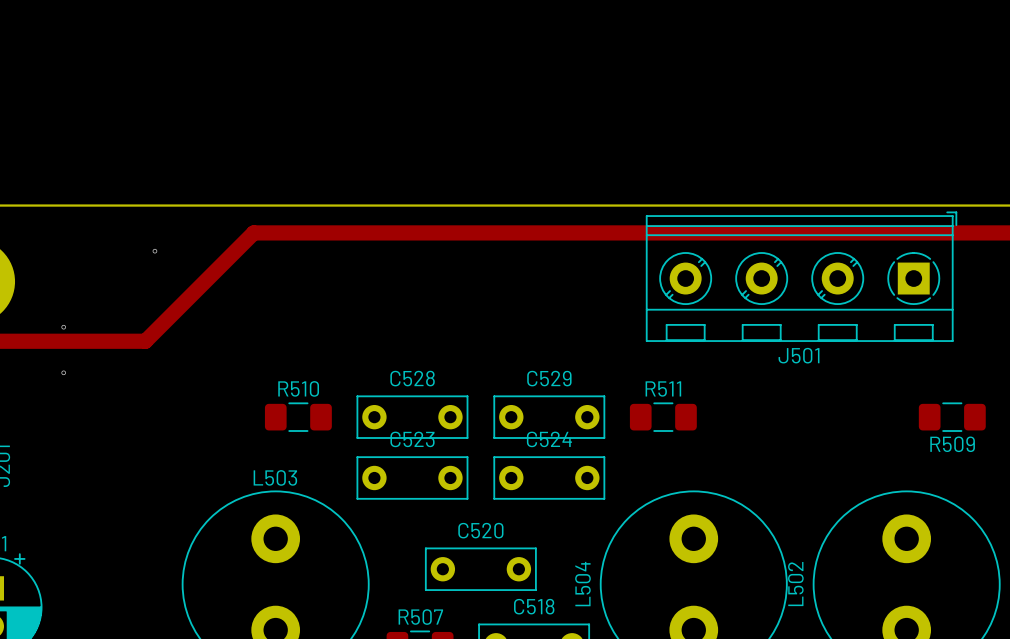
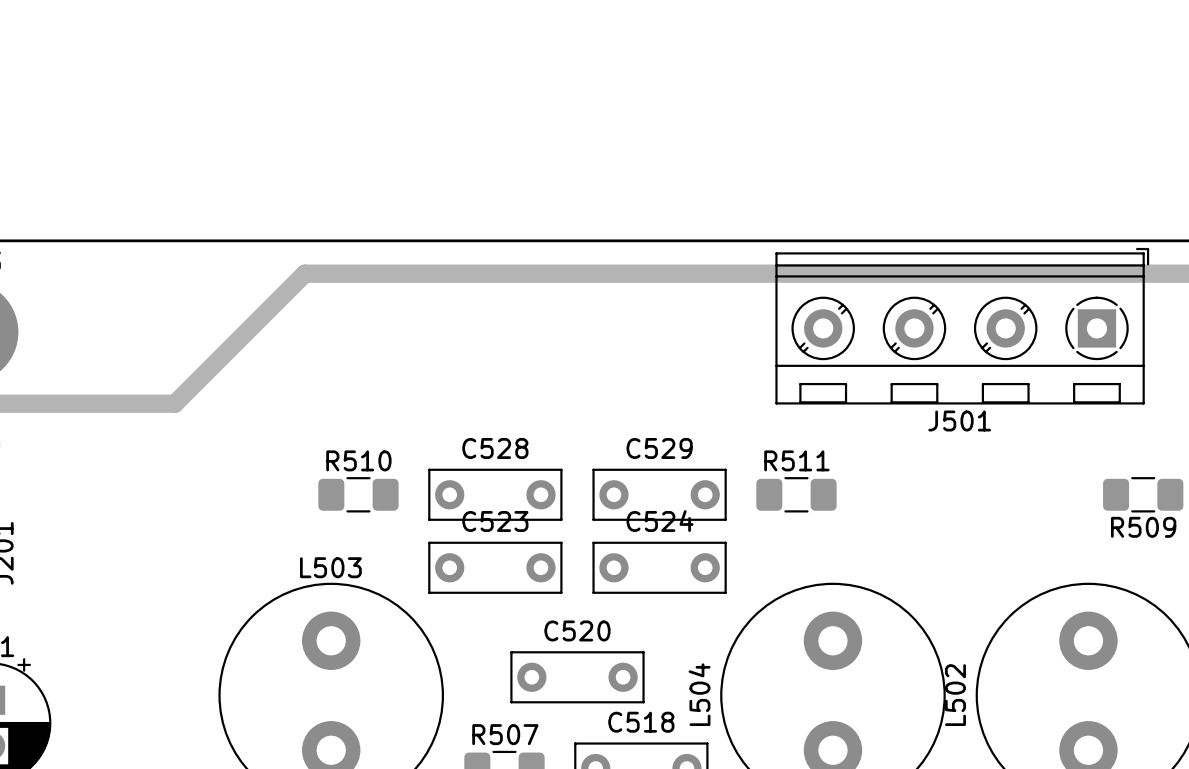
via: (154, 251) -> none
via: (63, 327) -> none
via: (63, 372) -> none

